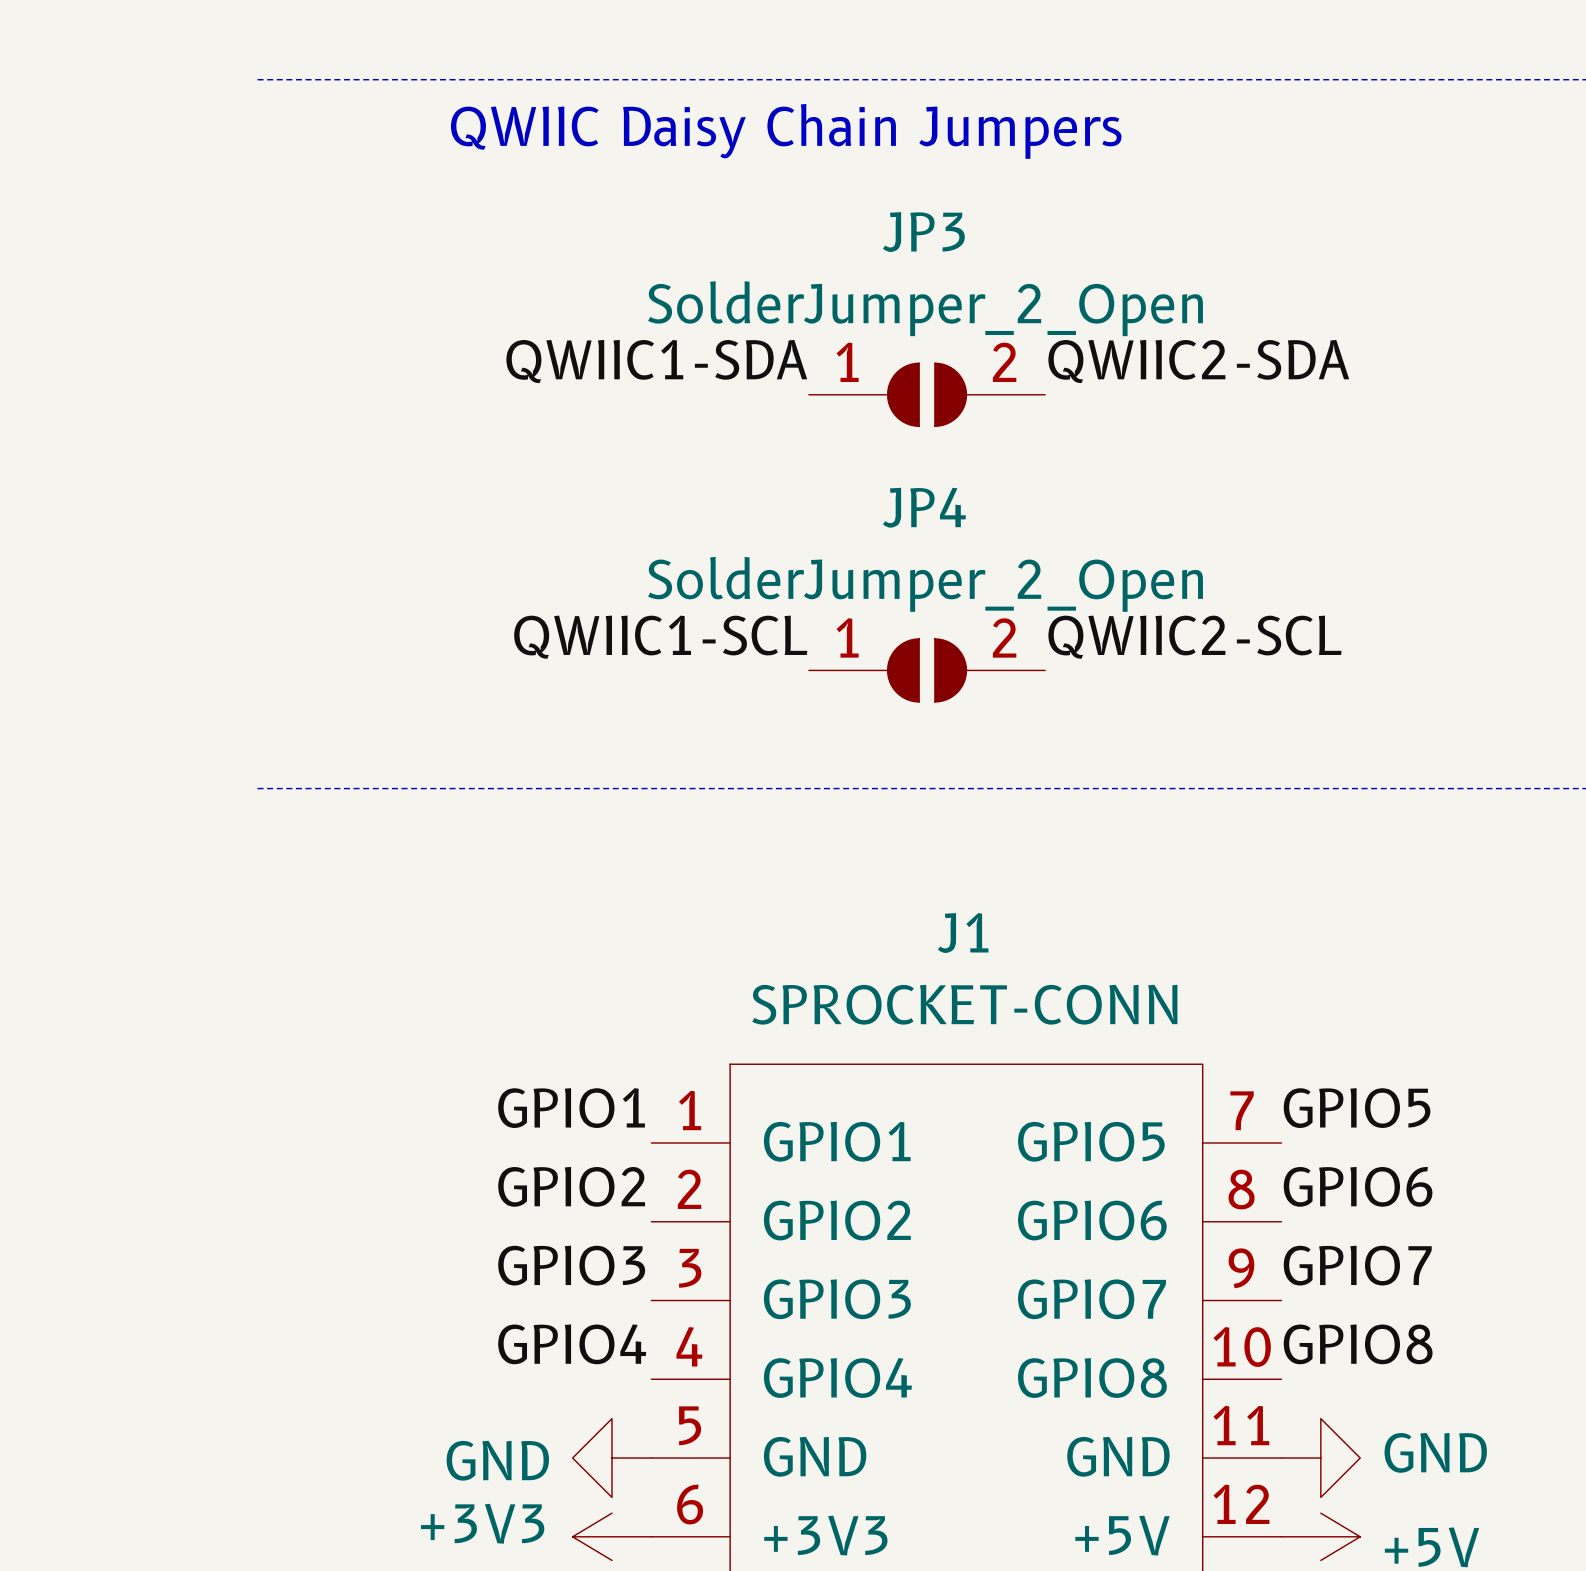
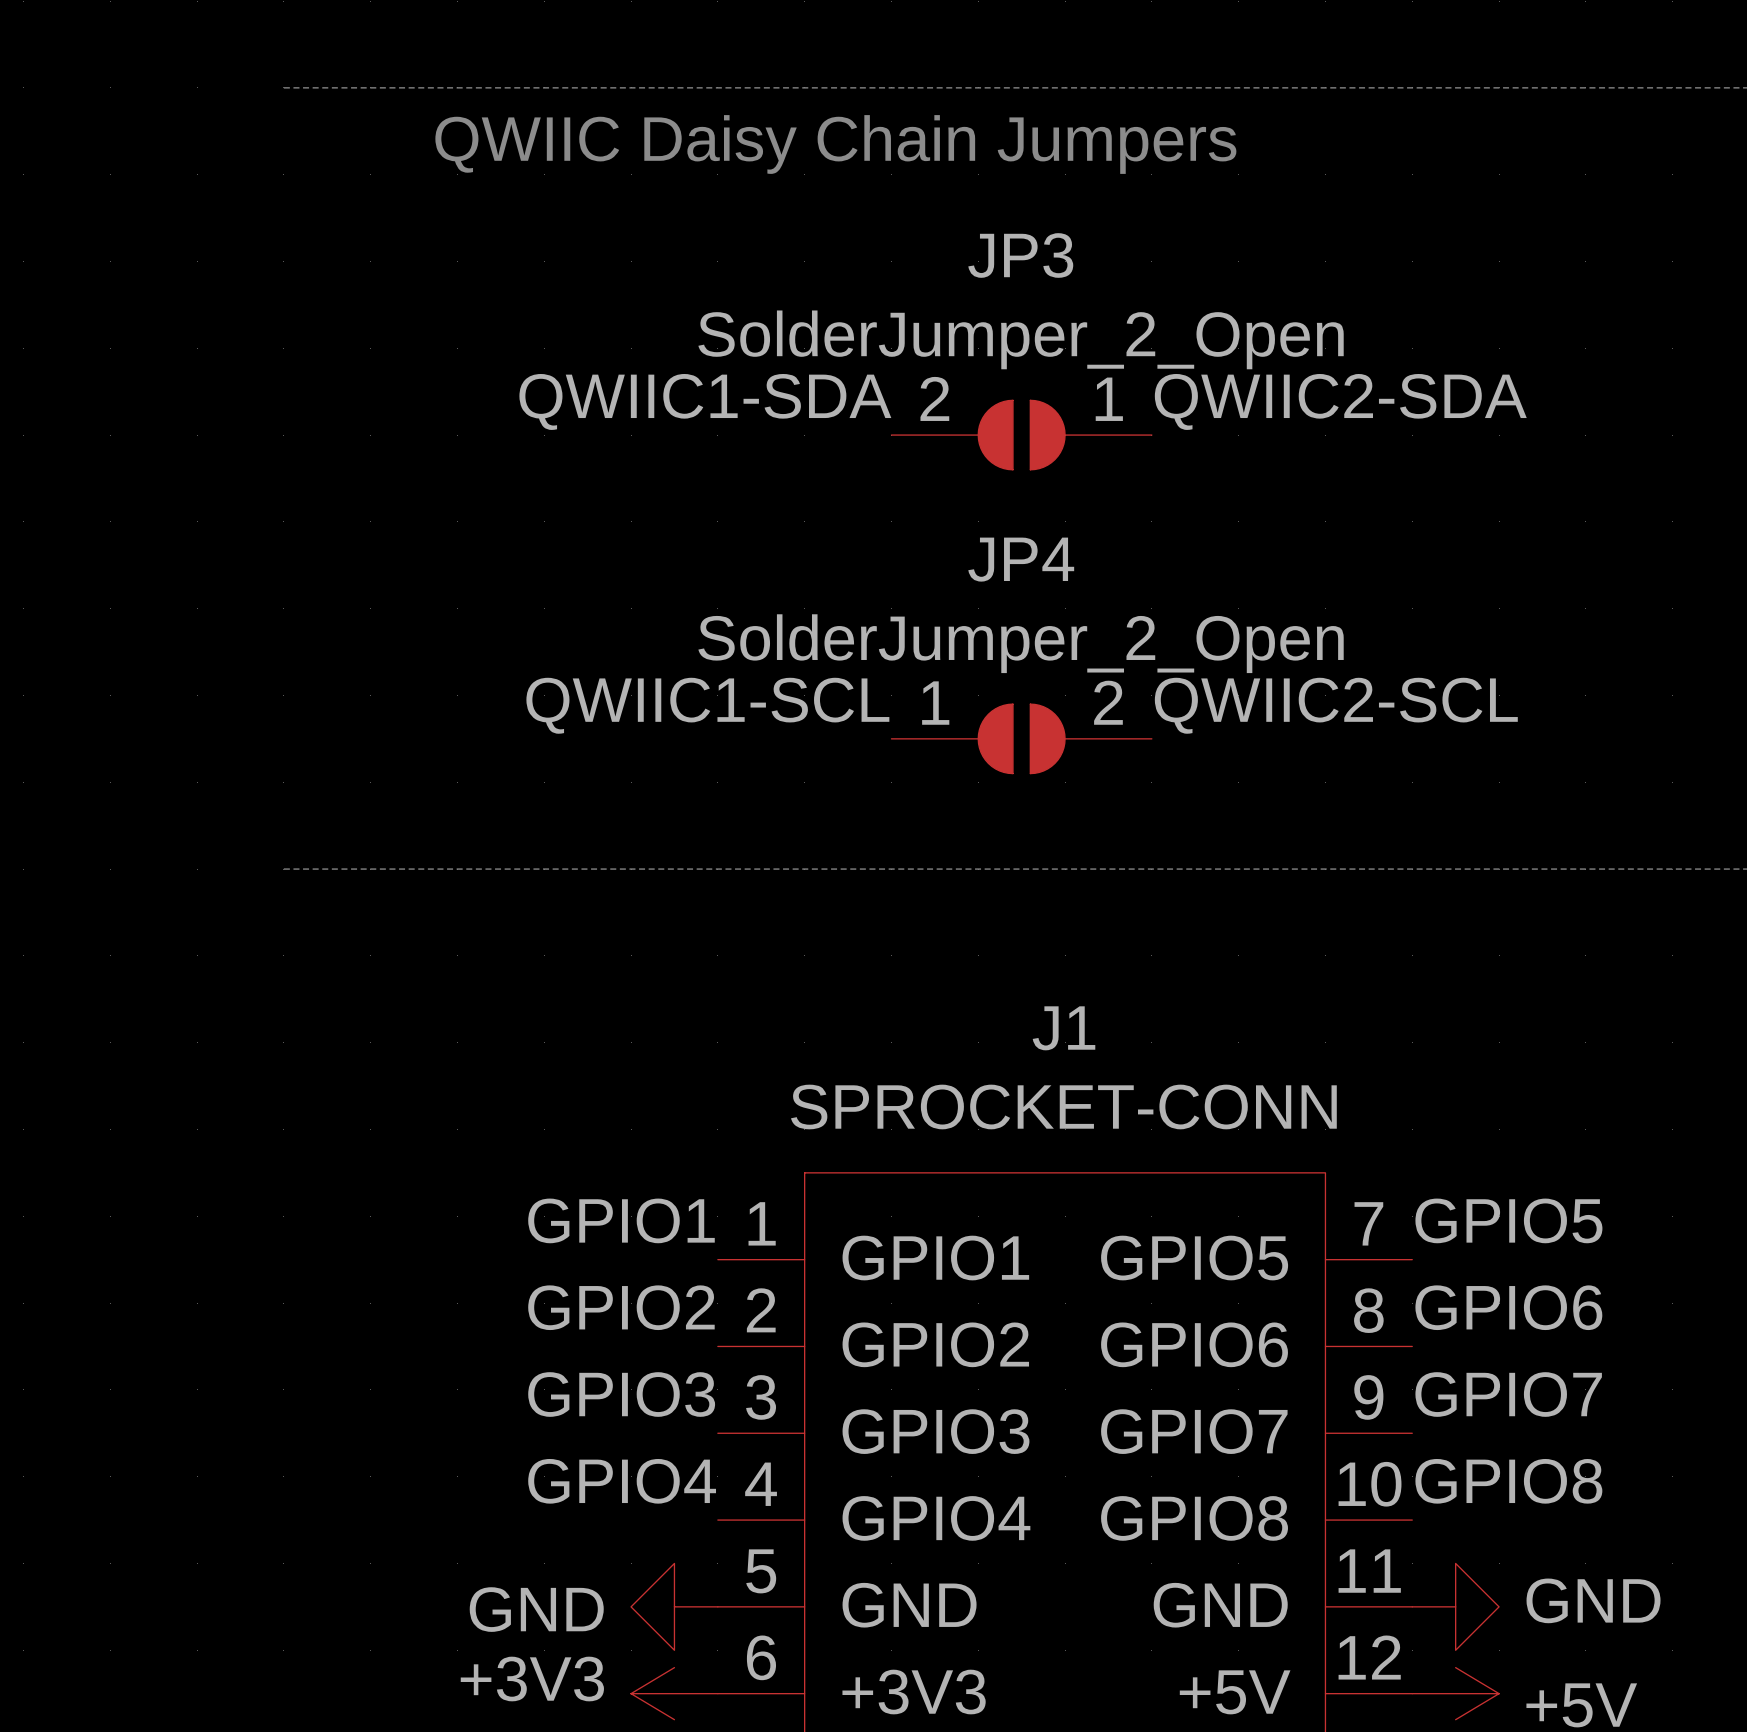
JP3 rotation: 0° (927, 394) -> 180° (1021, 435)

